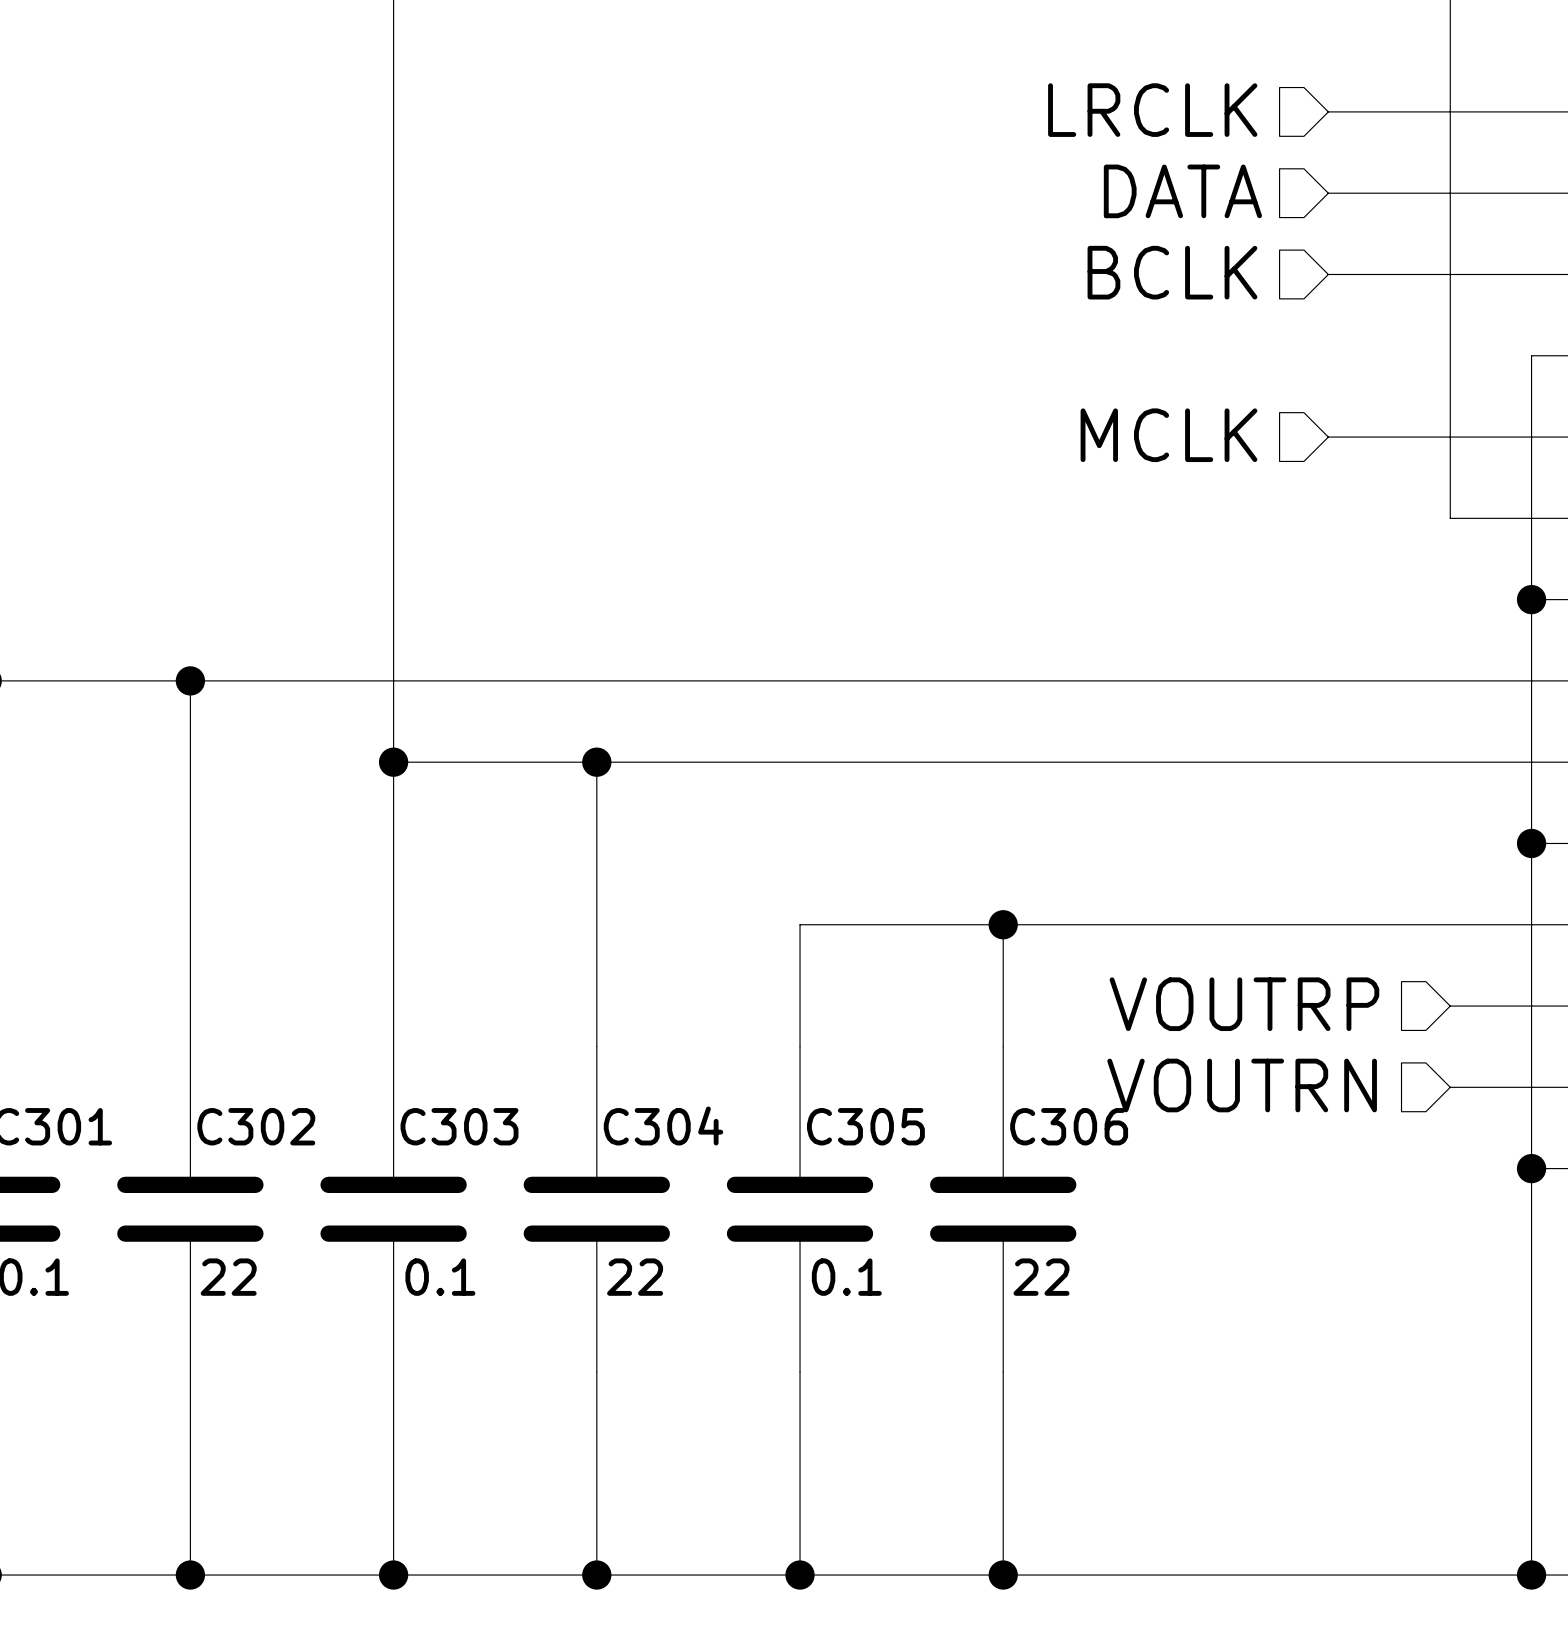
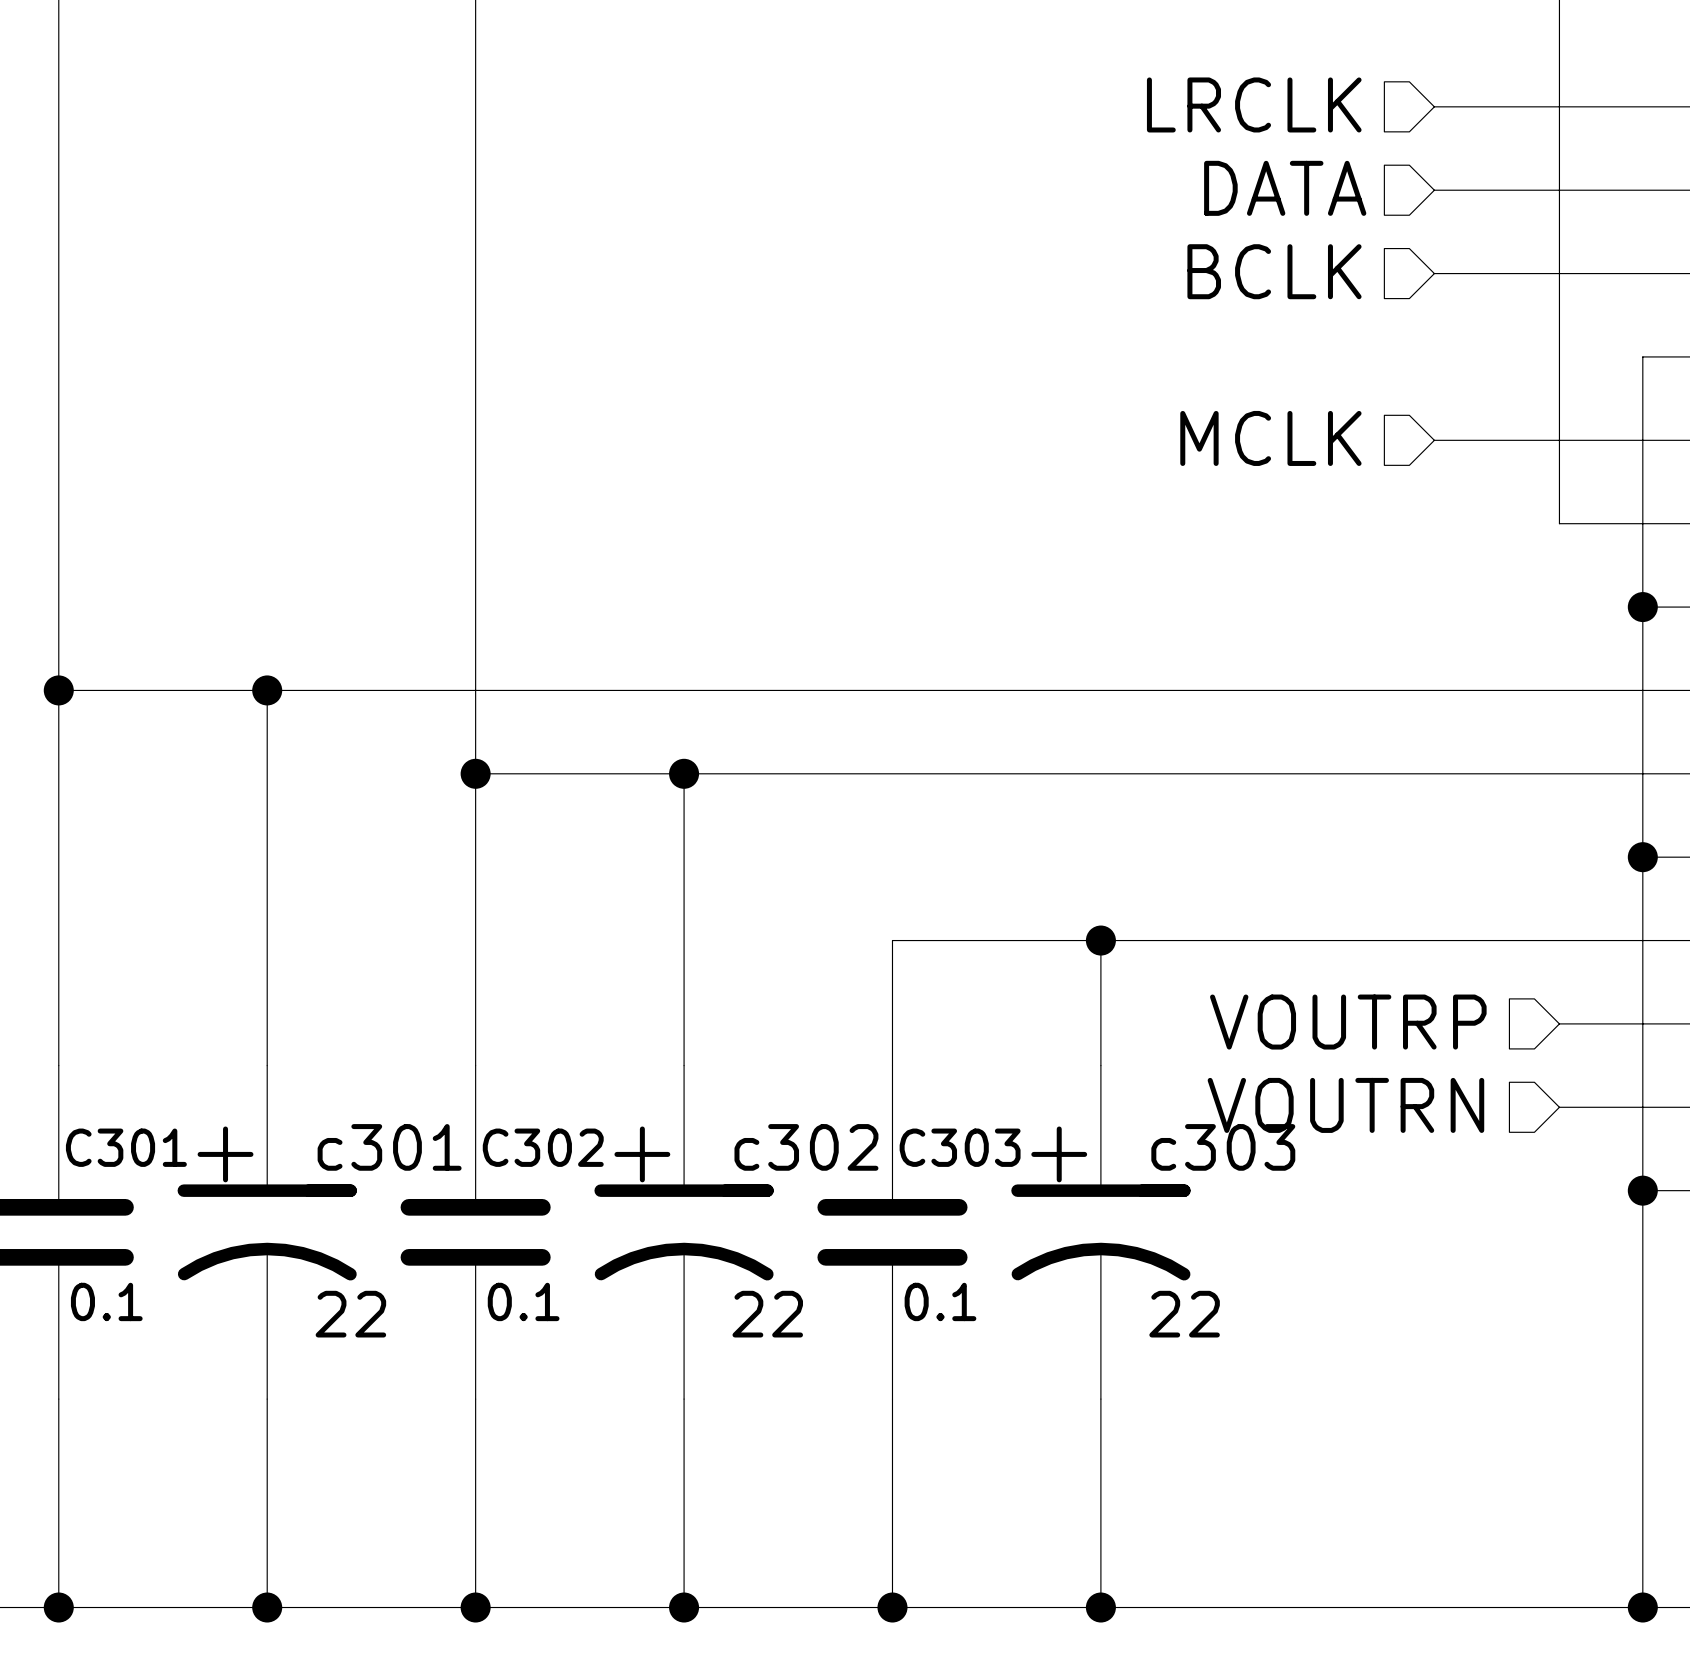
C303 name: C303 (459, 1126) -> C302 (543, 1147)
C305 name: C305 (865, 1126) -> C303 (960, 1147)
C302: 22 (190, 1209) -> none
c301: none -> 22 (267, 1232)
C304: 22 (596, 1209) -> none
c302: none -> 22 (684, 1232)
C306: 22 (1003, 1209) -> none
c303: none -> 22 (1100, 1232)

